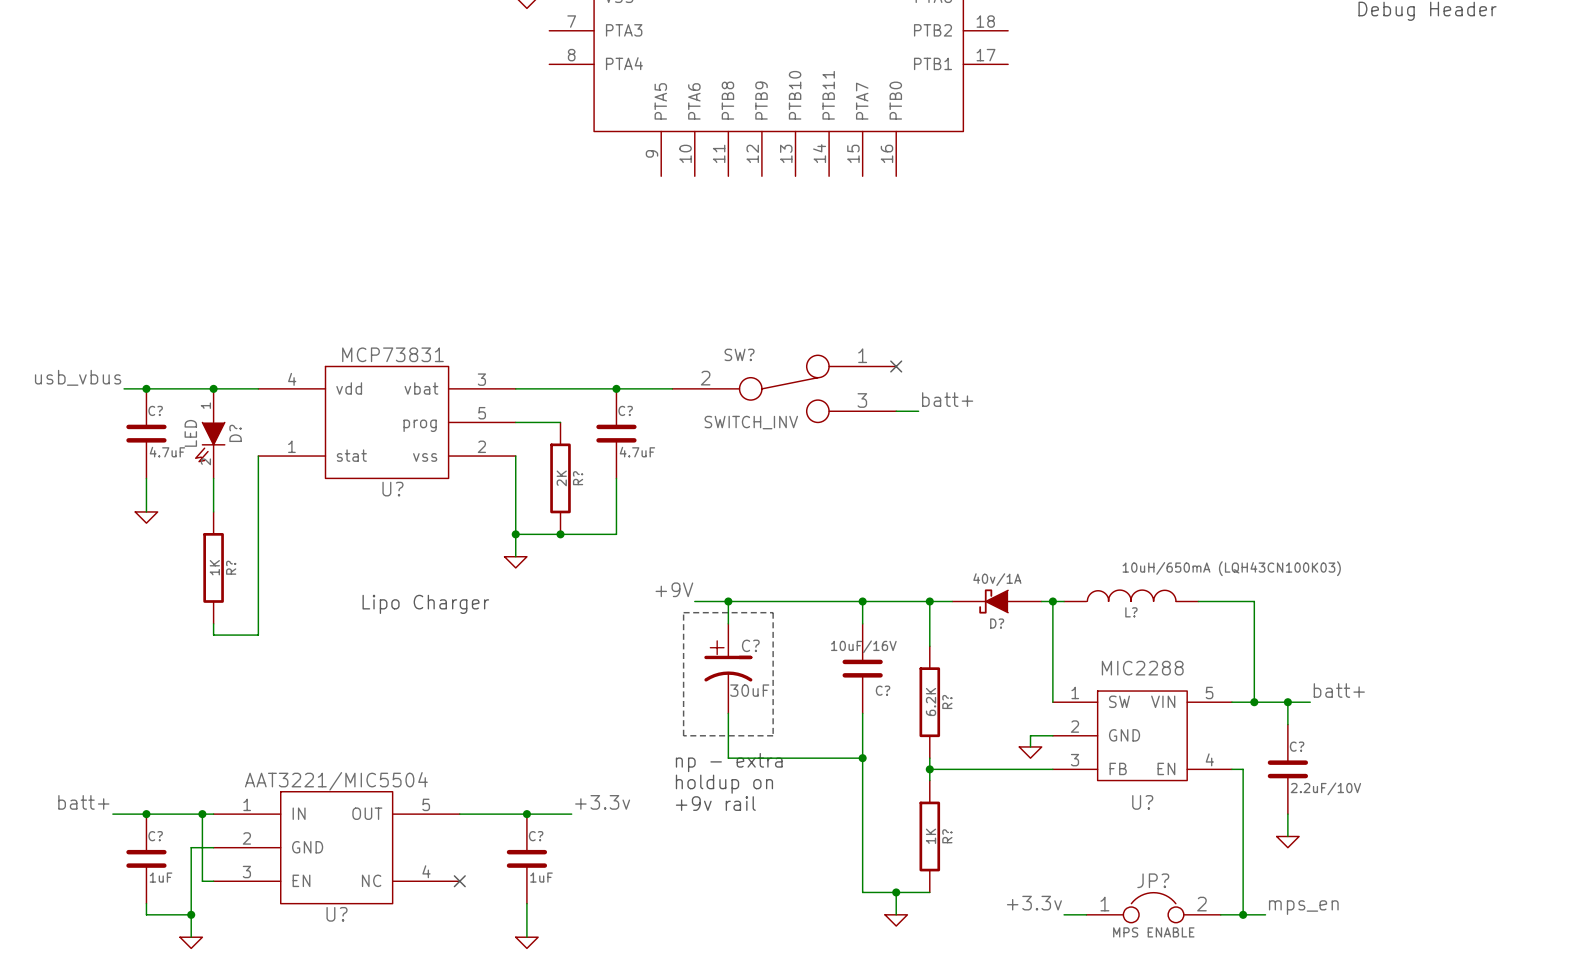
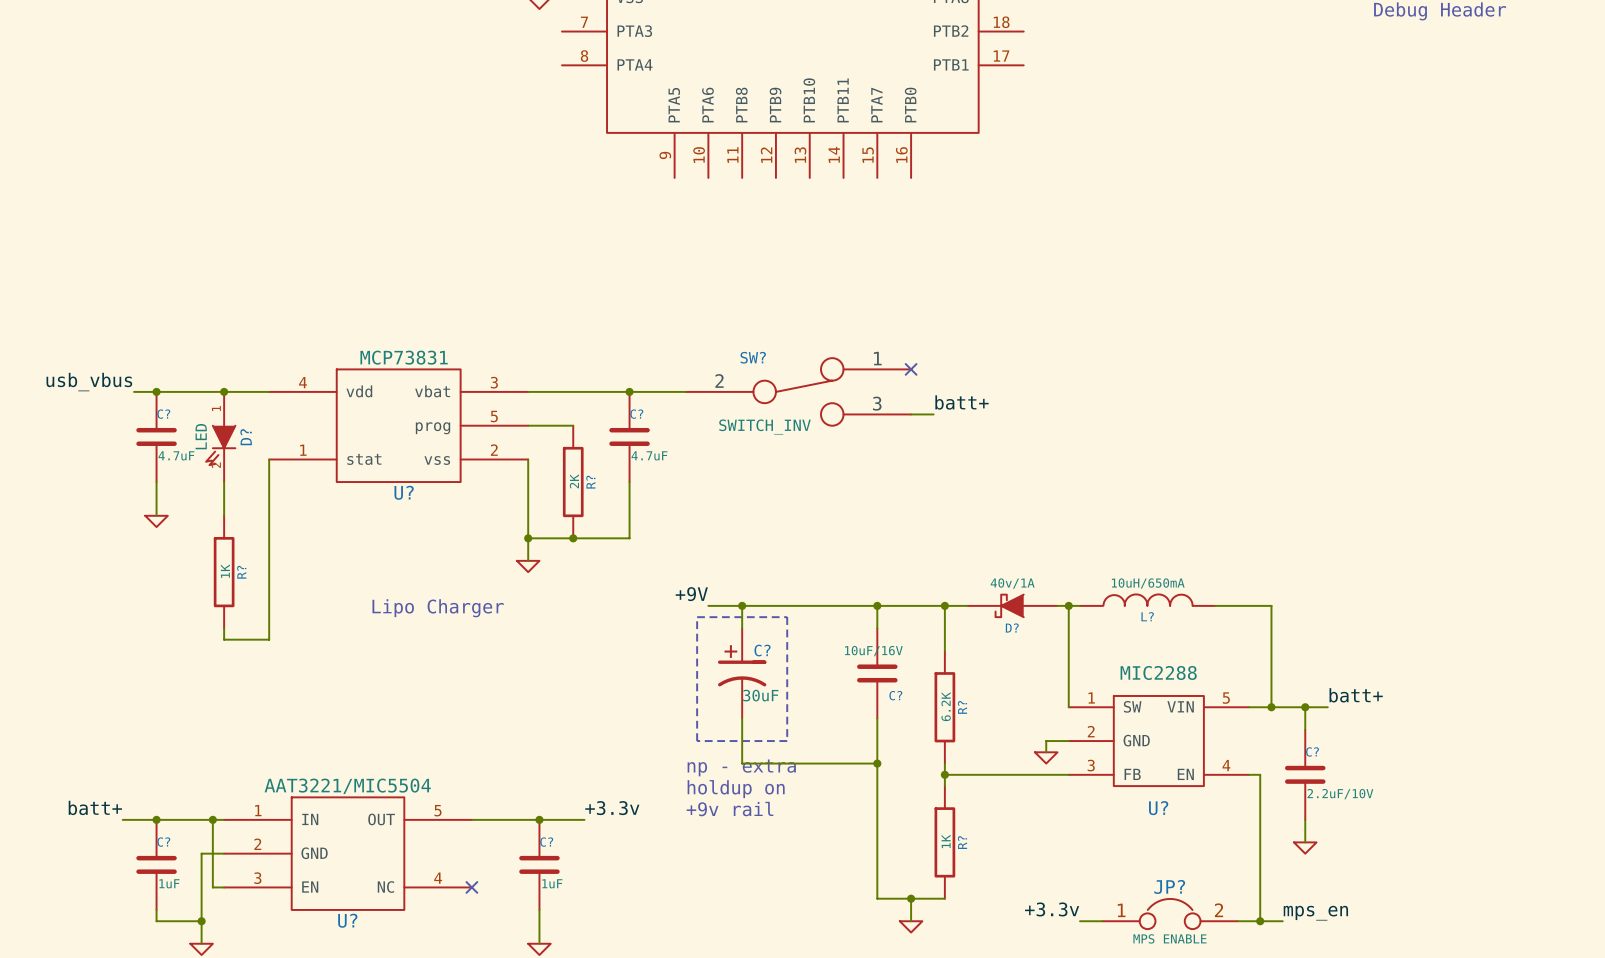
L? value: 10uH/650mA (LQH43CN100K03) (1231, 568) -> 10uH/650mA (1148, 583)

